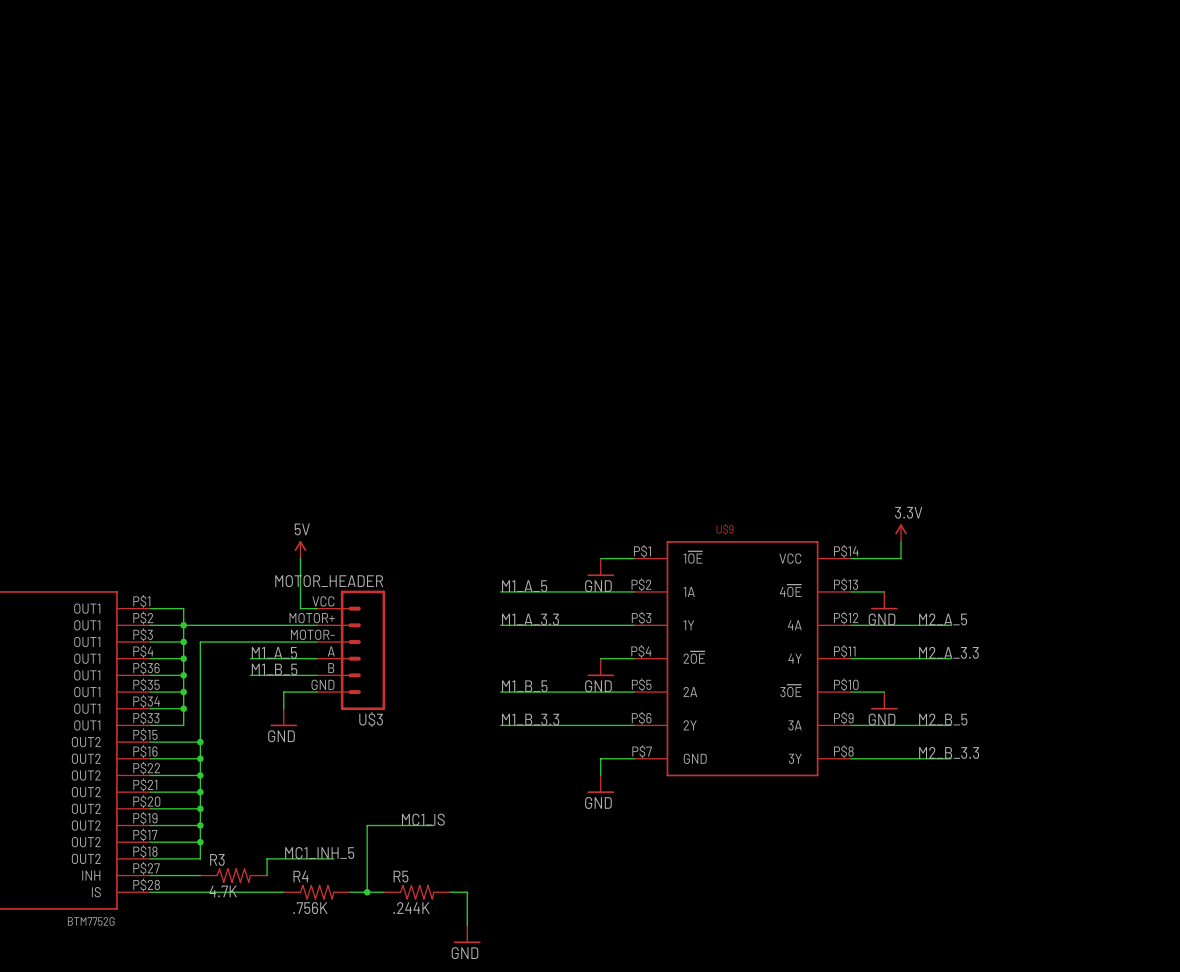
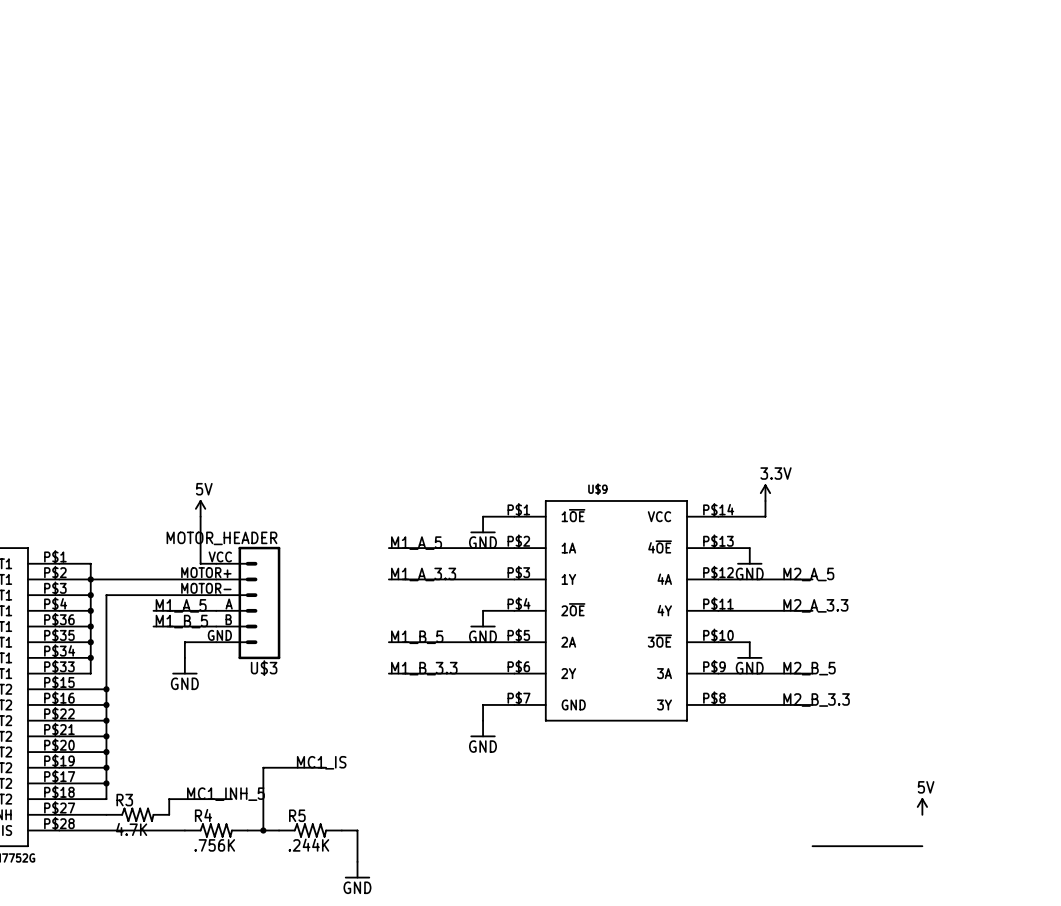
power symbol: none -> 5V (922, 806)
wire: none -> (812, 846) (922, 846)

